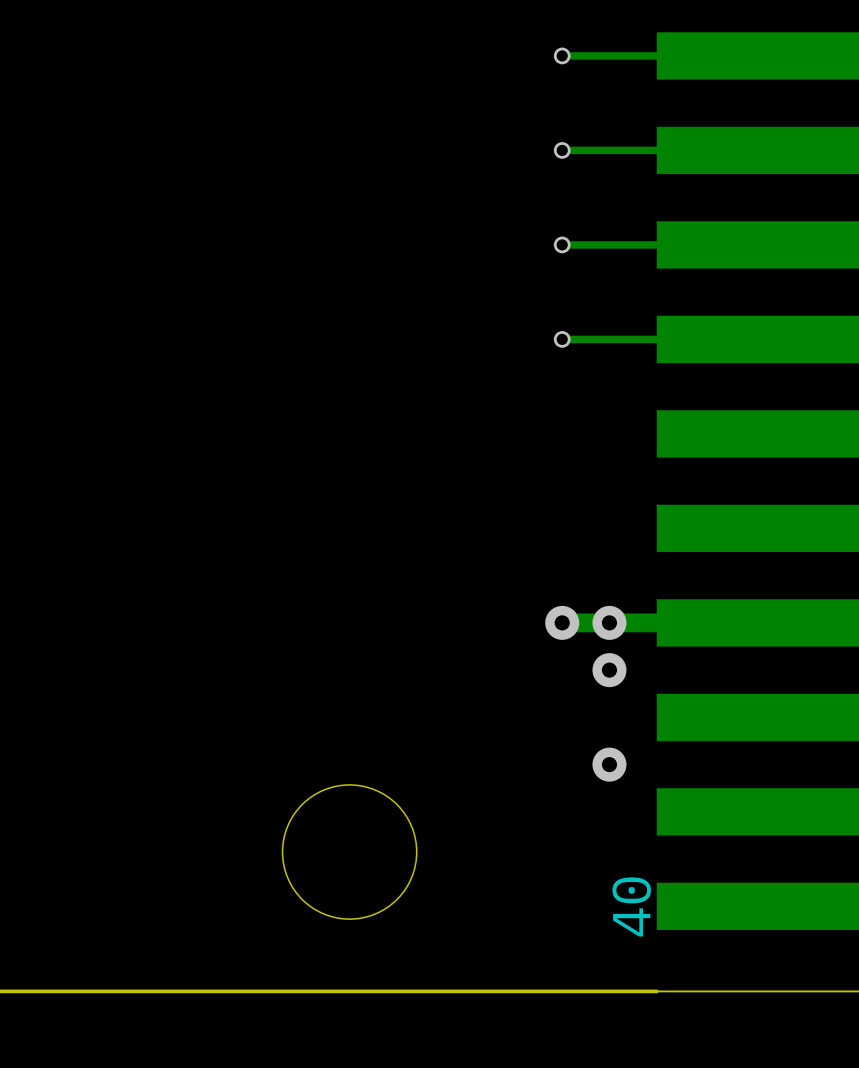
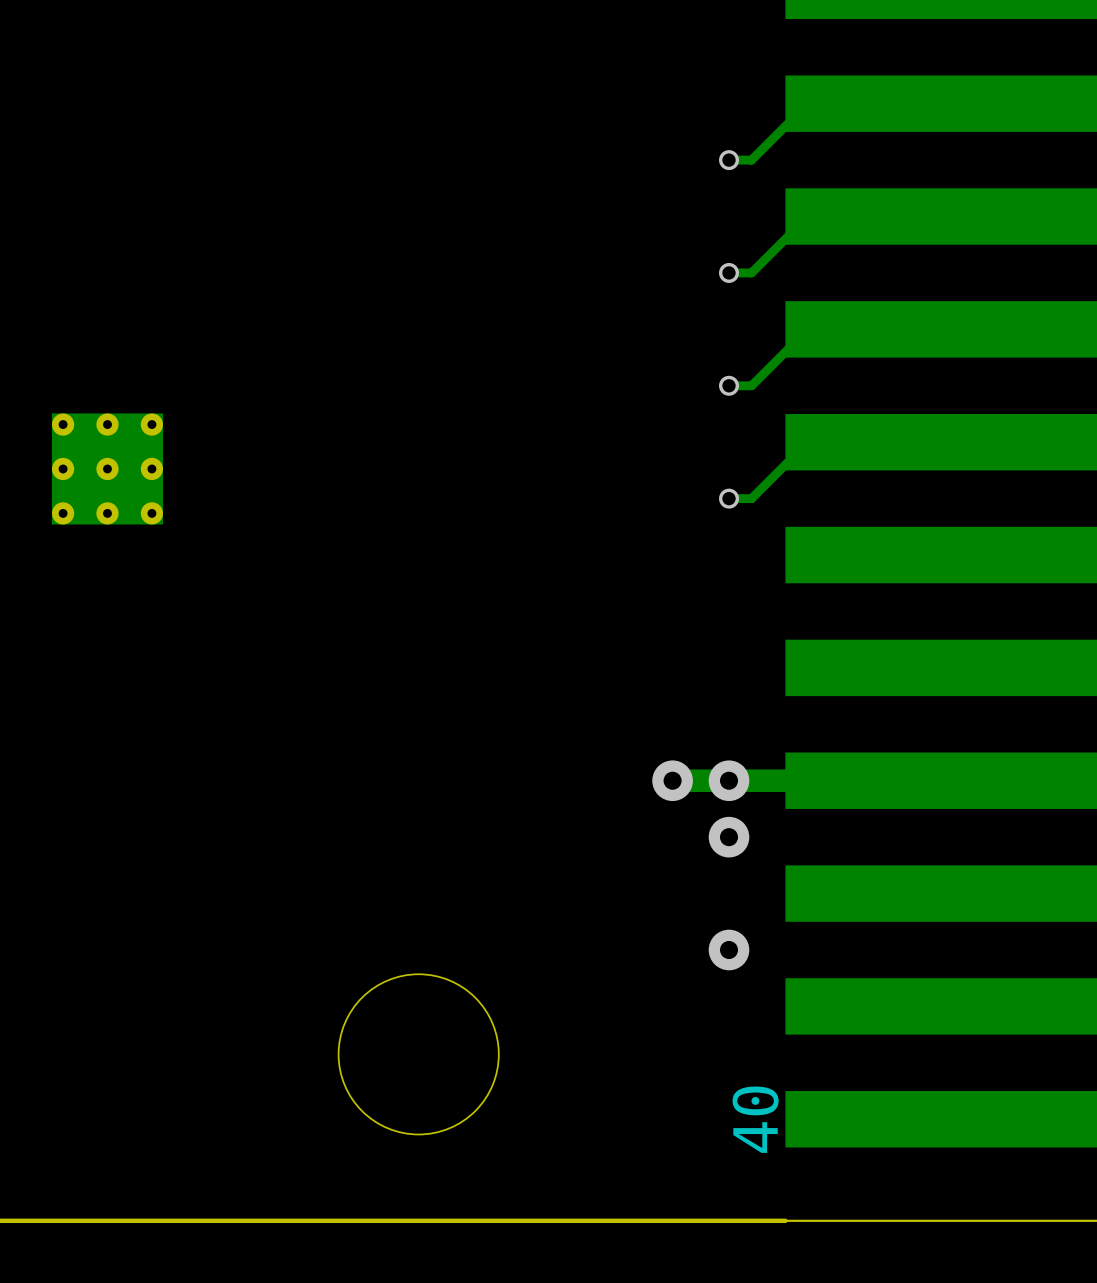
via: (562, 55) -> none
track: (675, 55) (562, 55) -> (807, 103) (751, 160) (729, 160)
via: none -> (729, 160)
via: (562, 150) -> none
track: (675, 150) (562, 150) -> (807, 216) (751, 272) (729, 272)
via: none -> (729, 272)
via: (562, 244) -> none
track: (675, 244) (562, 244) -> (807, 329) (751, 385) (729, 385)
via: none -> (729, 385)
via: (562, 339) -> none
track: (675, 339) (562, 339) -> (807, 442) (751, 498) (729, 498)
part: none -> (107, 468)
via: none -> (729, 498)

